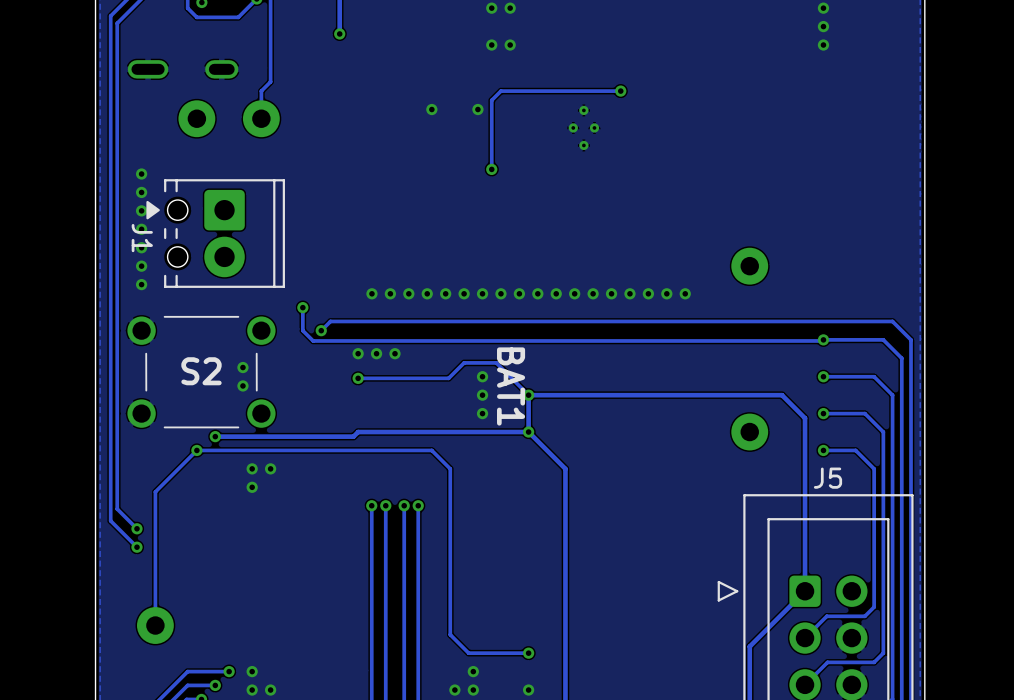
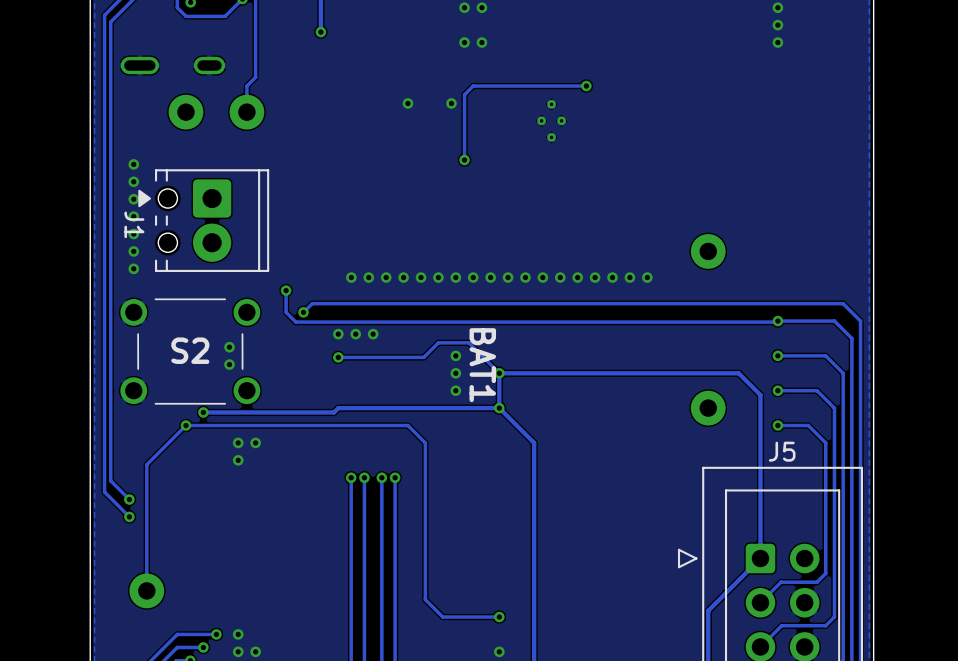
via: (473, 671) -> none
via: (454, 690) -> none
via: (473, 690) -> none

